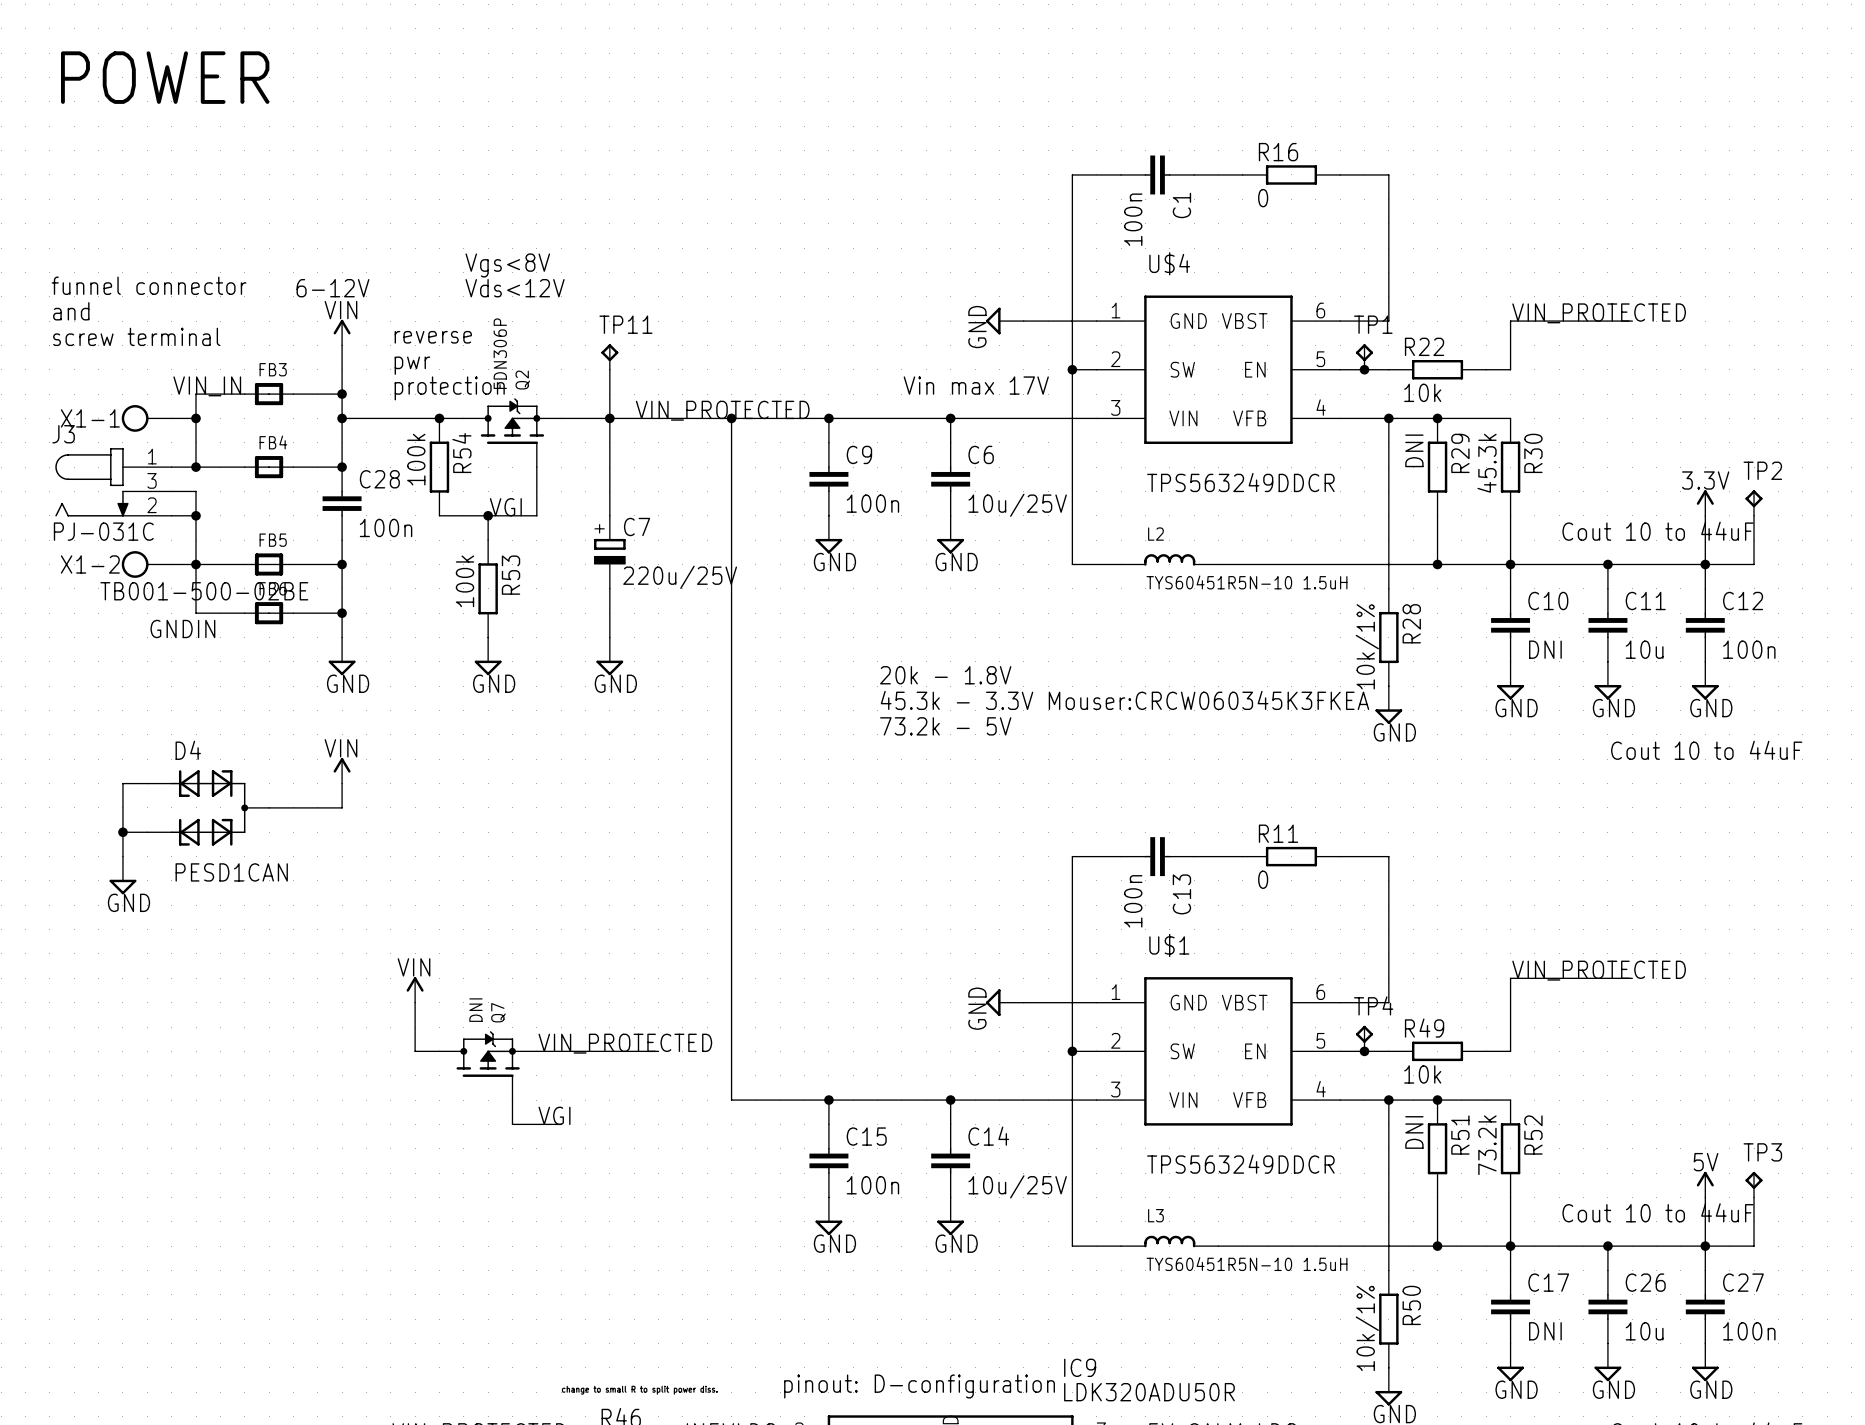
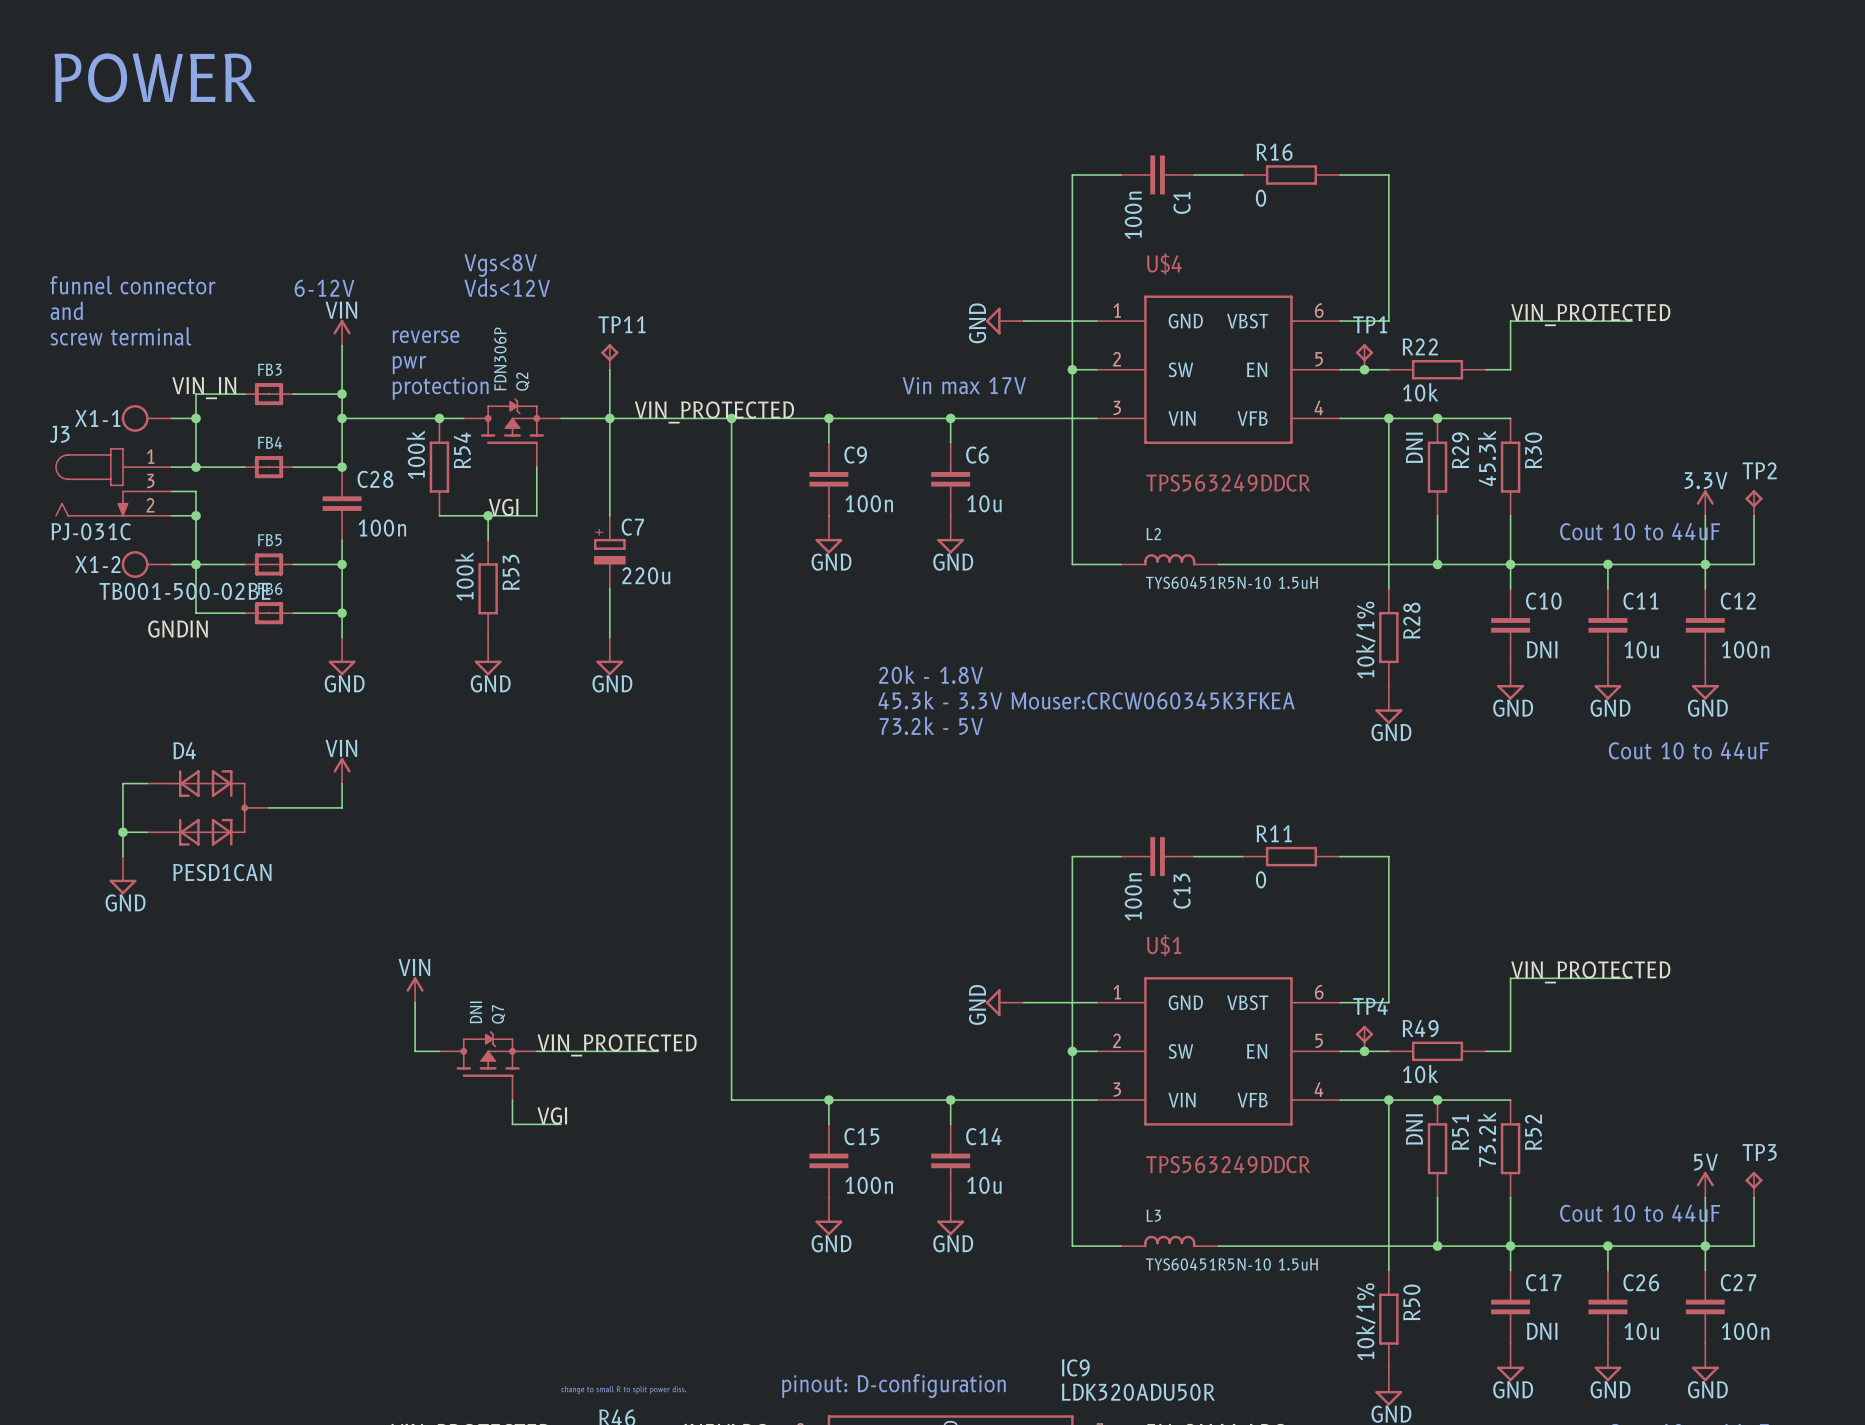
C6 value: 10u/25V (1017, 505) -> 10u (984, 503)
C7 value: 220u/25V (680, 577) -> 220u (646, 575)
C14 value: 10u/25V (1017, 1186) -> 10u (984, 1185)

